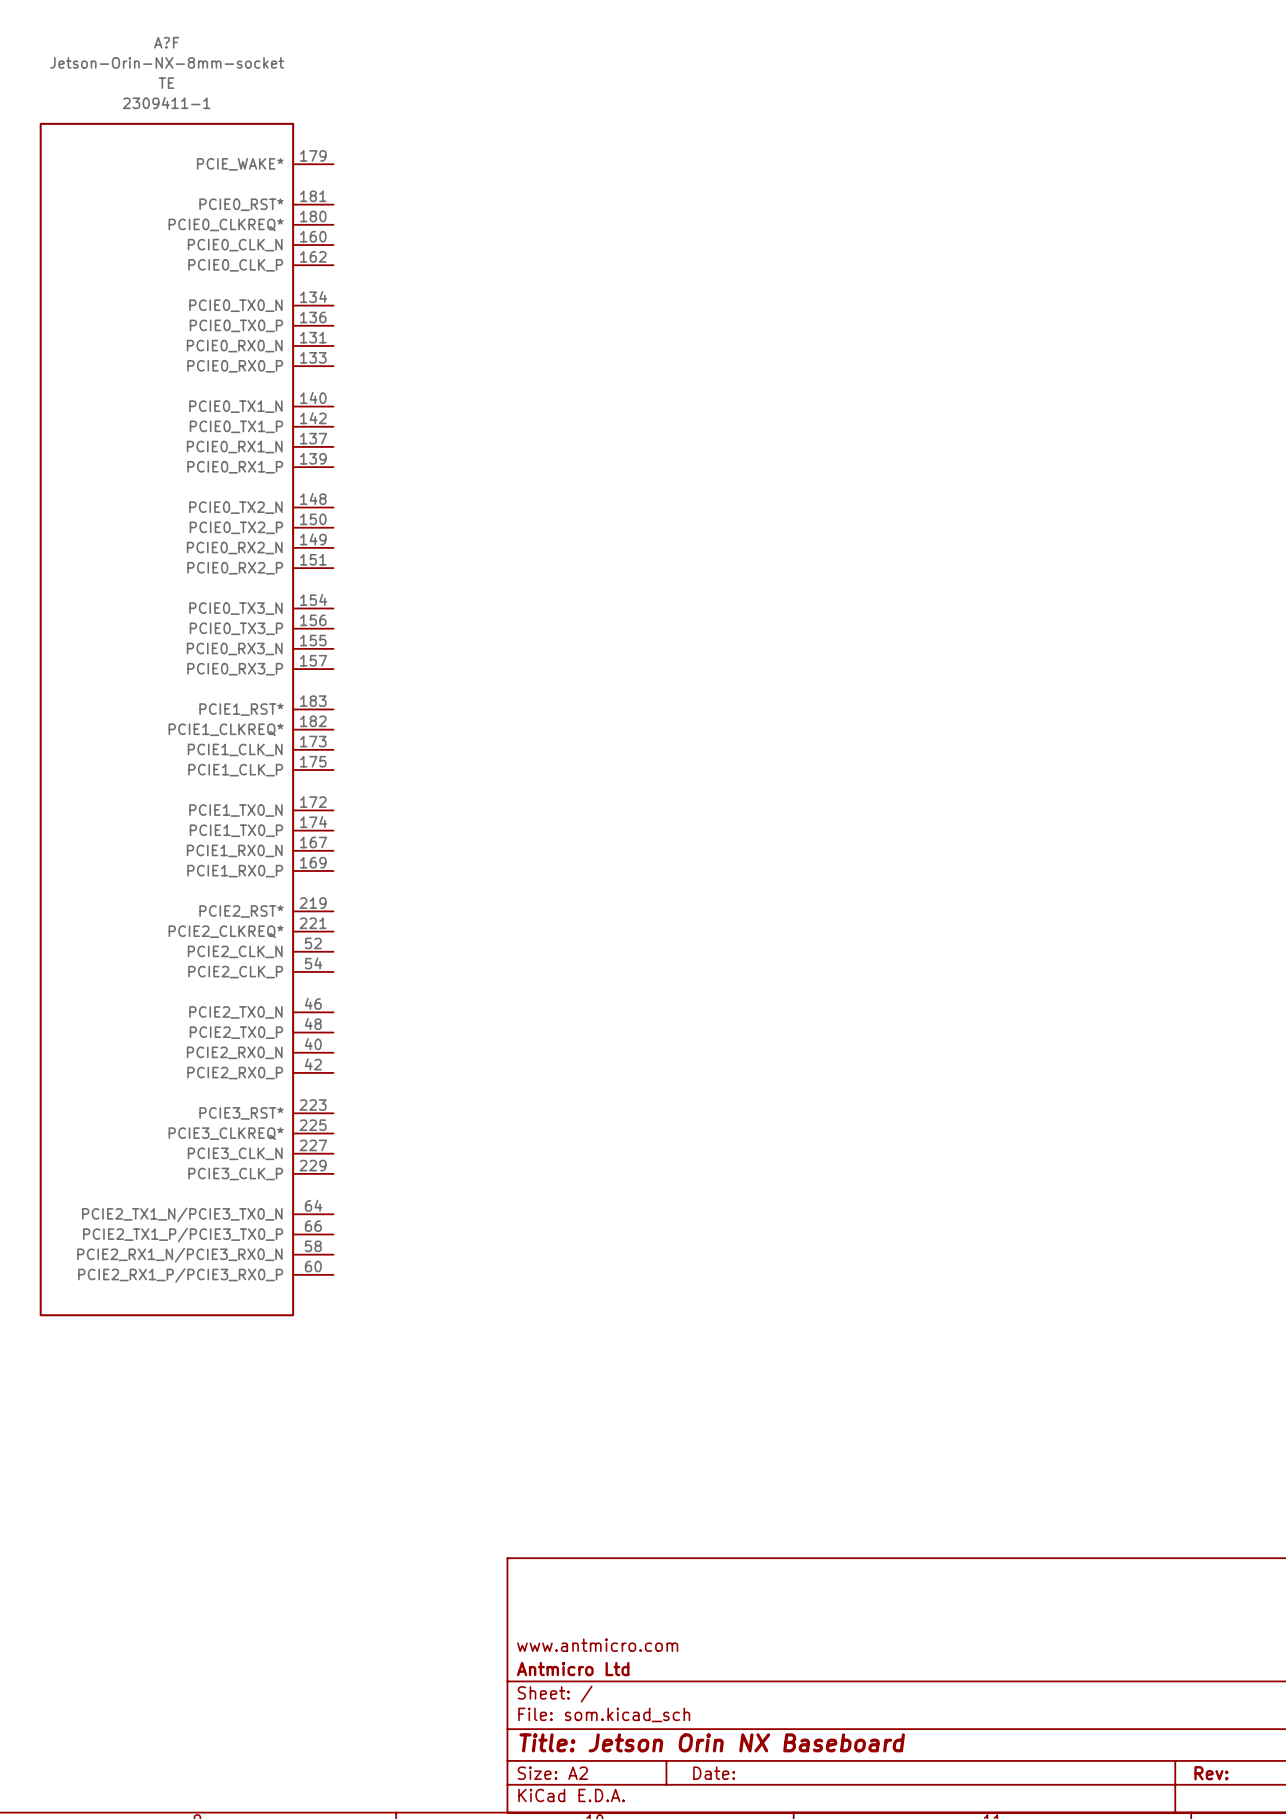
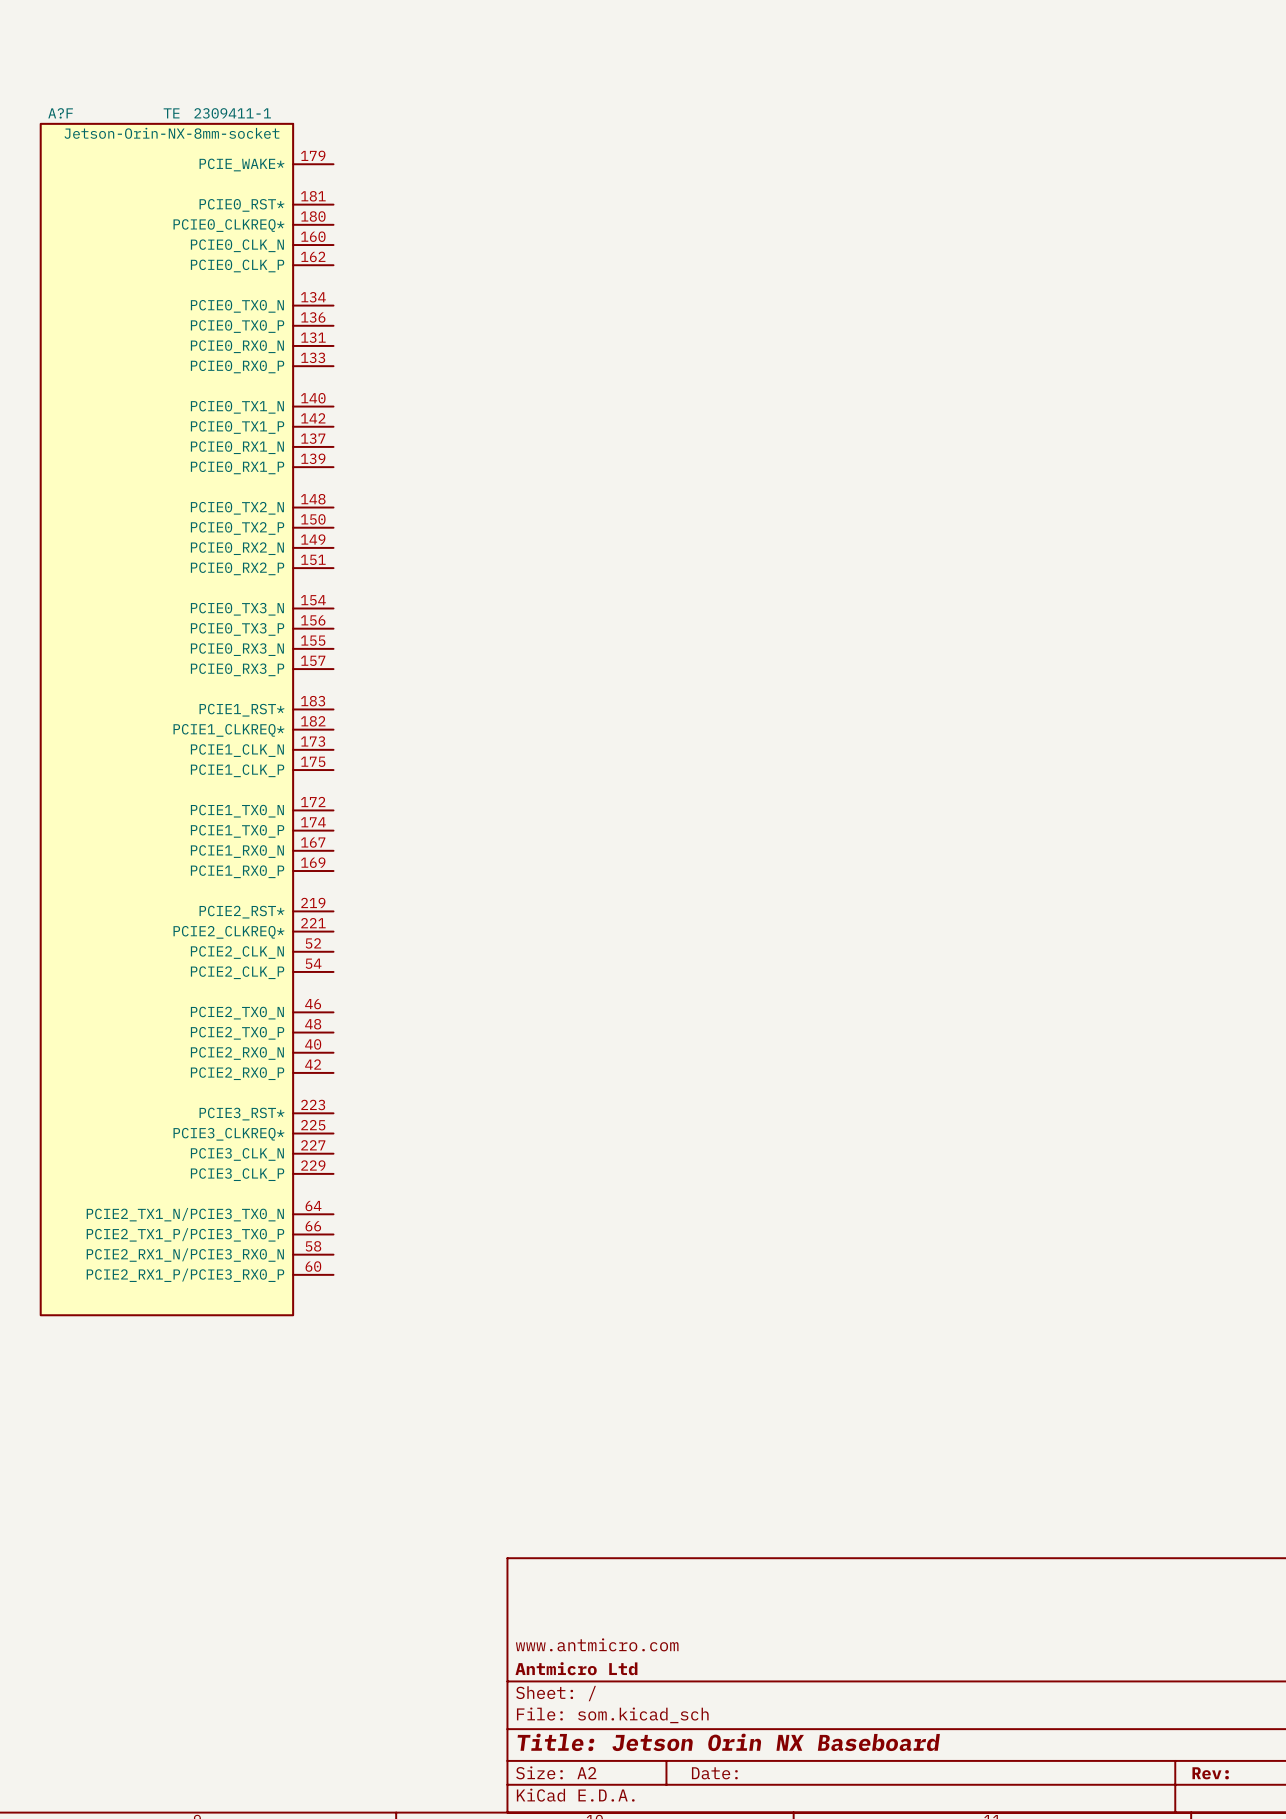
A?F name position: A?F (166, 42) -> A?F (60, 113)
A?F value position: Jetson-Orin-NX-8mm-socket (167, 62) -> Jetson-Orin-NX-8mm-socket (171, 133)
A?F text position: TE (166, 83) -> TE (171, 113)
A?F text position: 2309411-1 (166, 103) -> 2309411-1 (232, 113)

